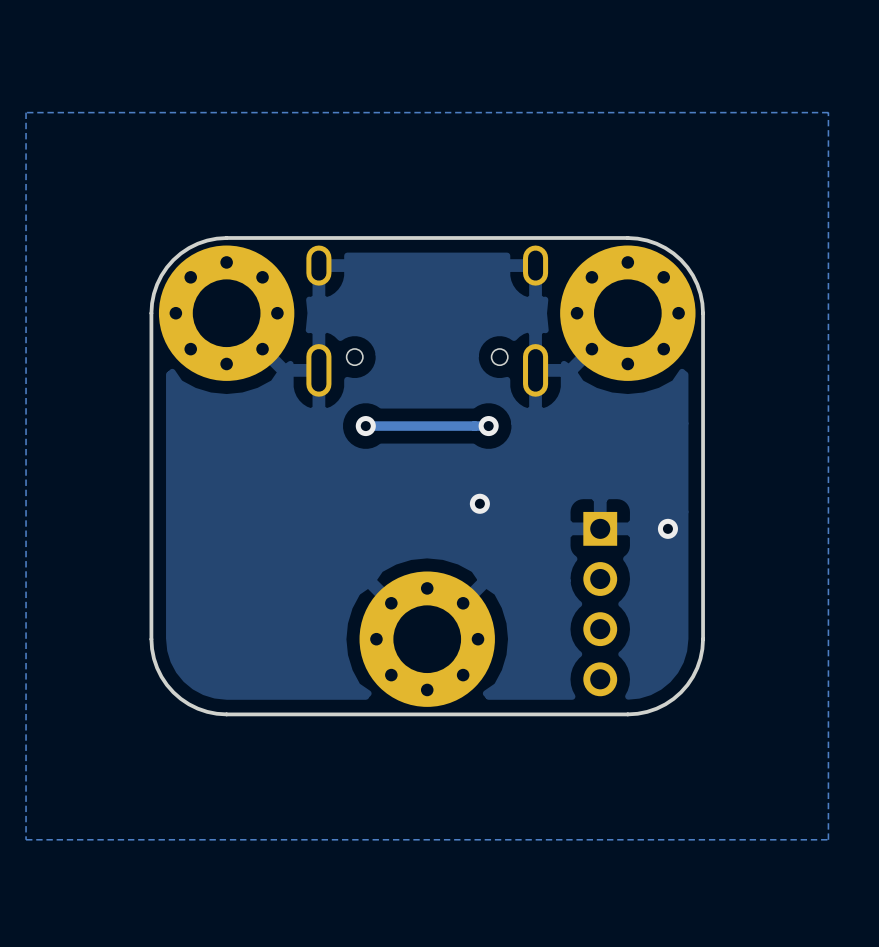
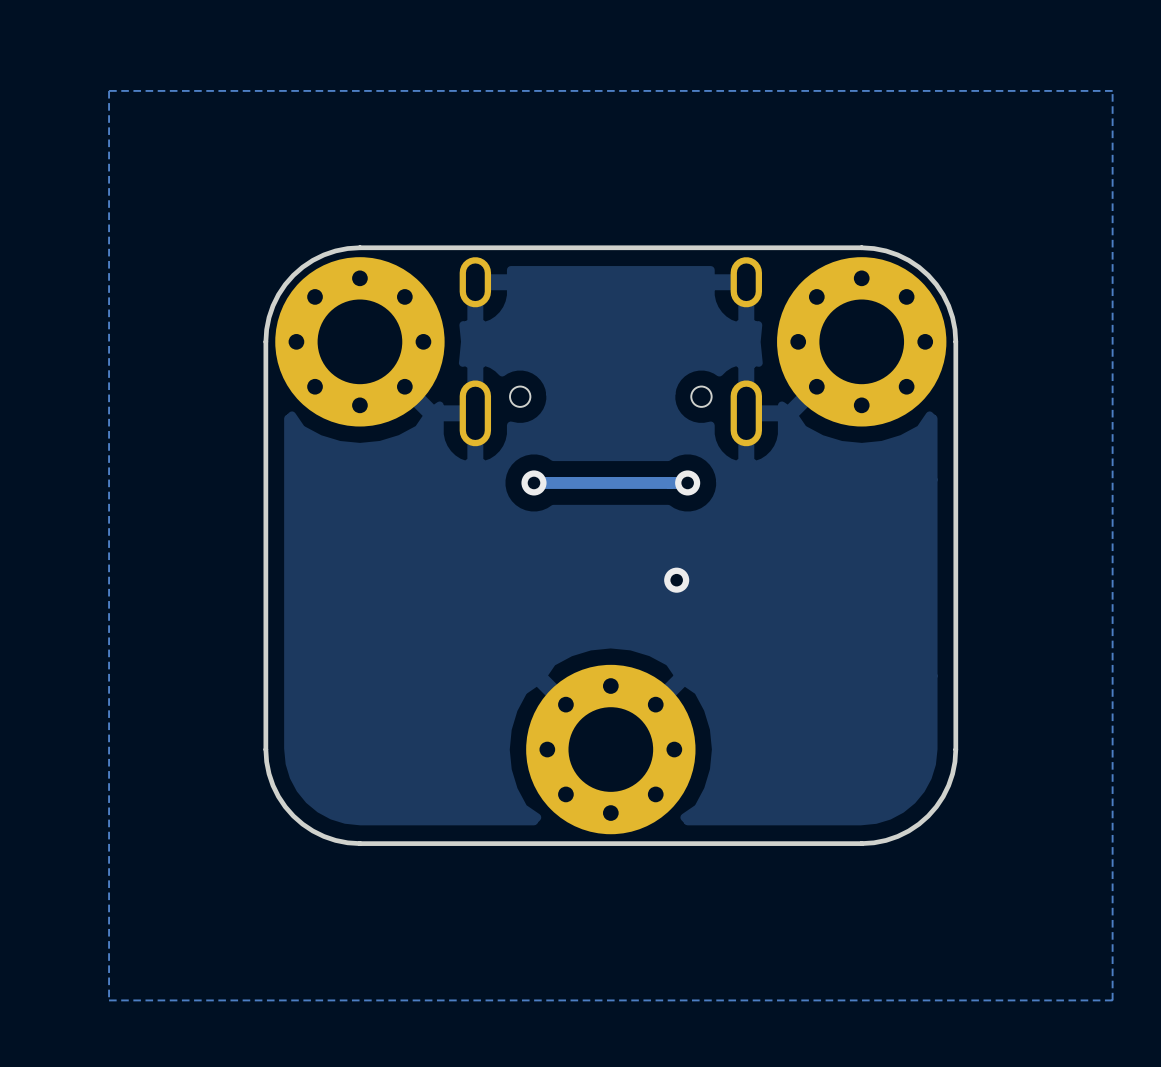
via: (667, 528) -> none
part: (600, 604) -> none

